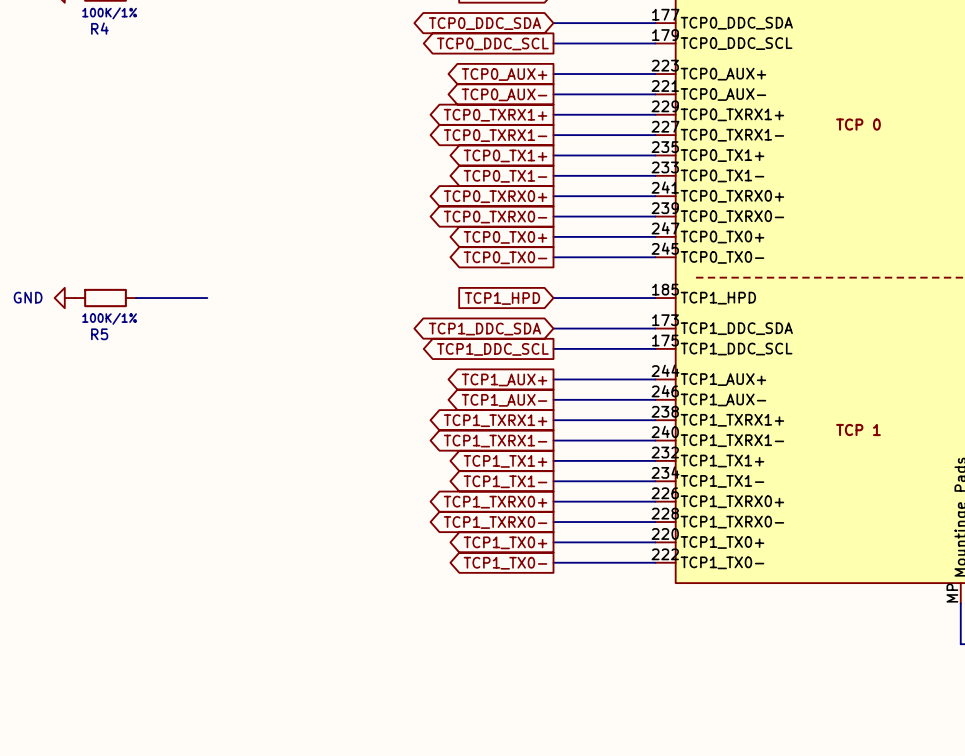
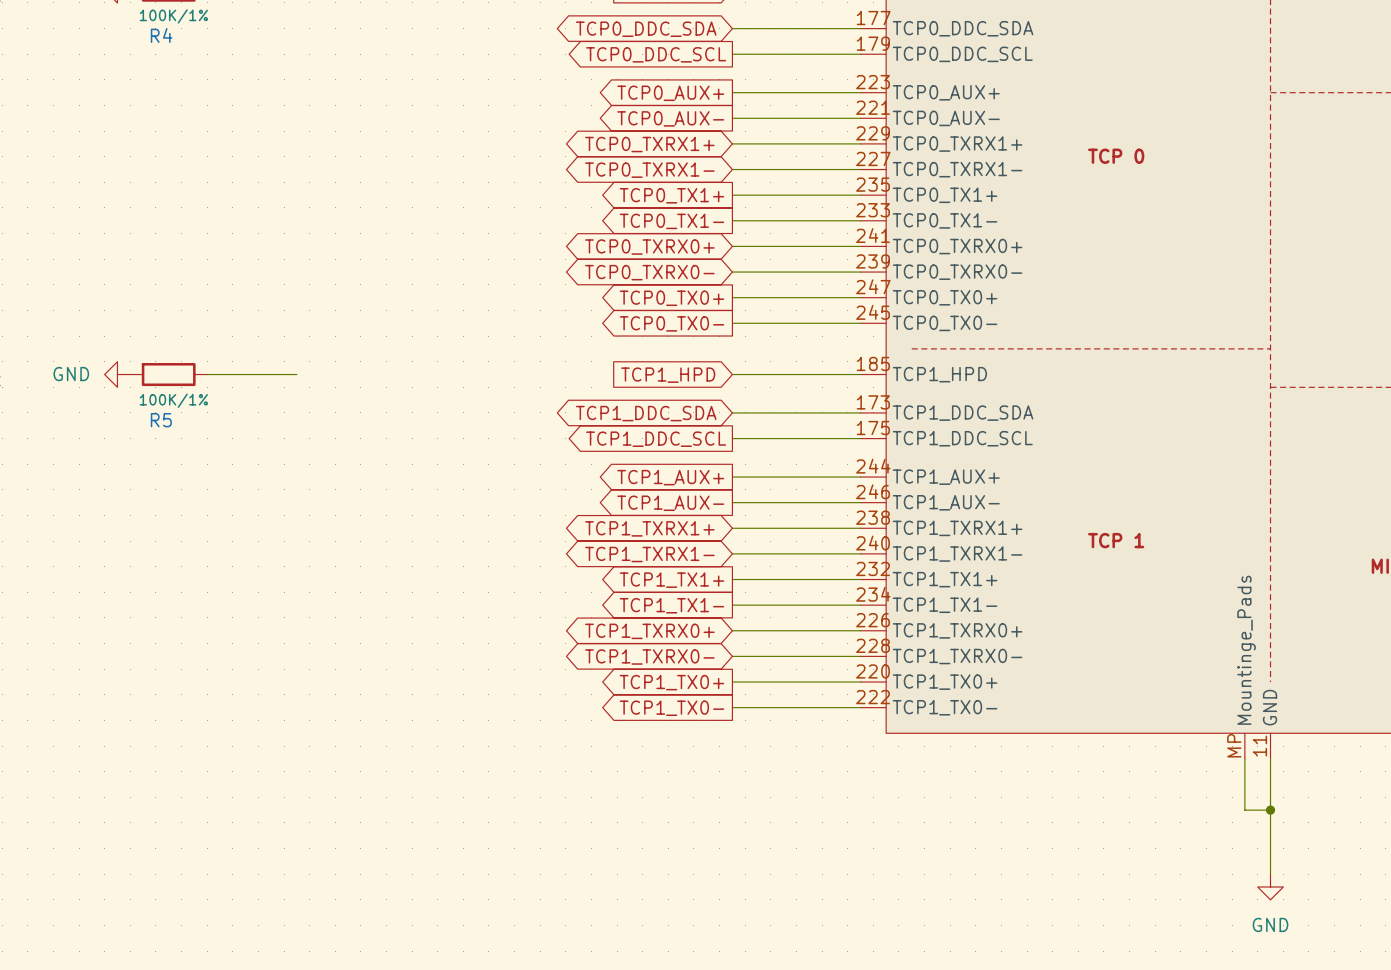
global label shape: output (495, 115) -> bidirectional (649, 144)
global label shape: output (495, 135) -> bidirectional (649, 170)
global label shape: output (495, 196) -> bidirectional (649, 247)
global label shape: output (495, 217) -> bidirectional (649, 272)
global label shape: output (495, 420) -> bidirectional (649, 528)
global label shape: output (495, 441) -> bidirectional (649, 554)
global label shape: output (495, 502) -> bidirectional (649, 631)
global label shape: output (495, 522) -> bidirectional (649, 657)

